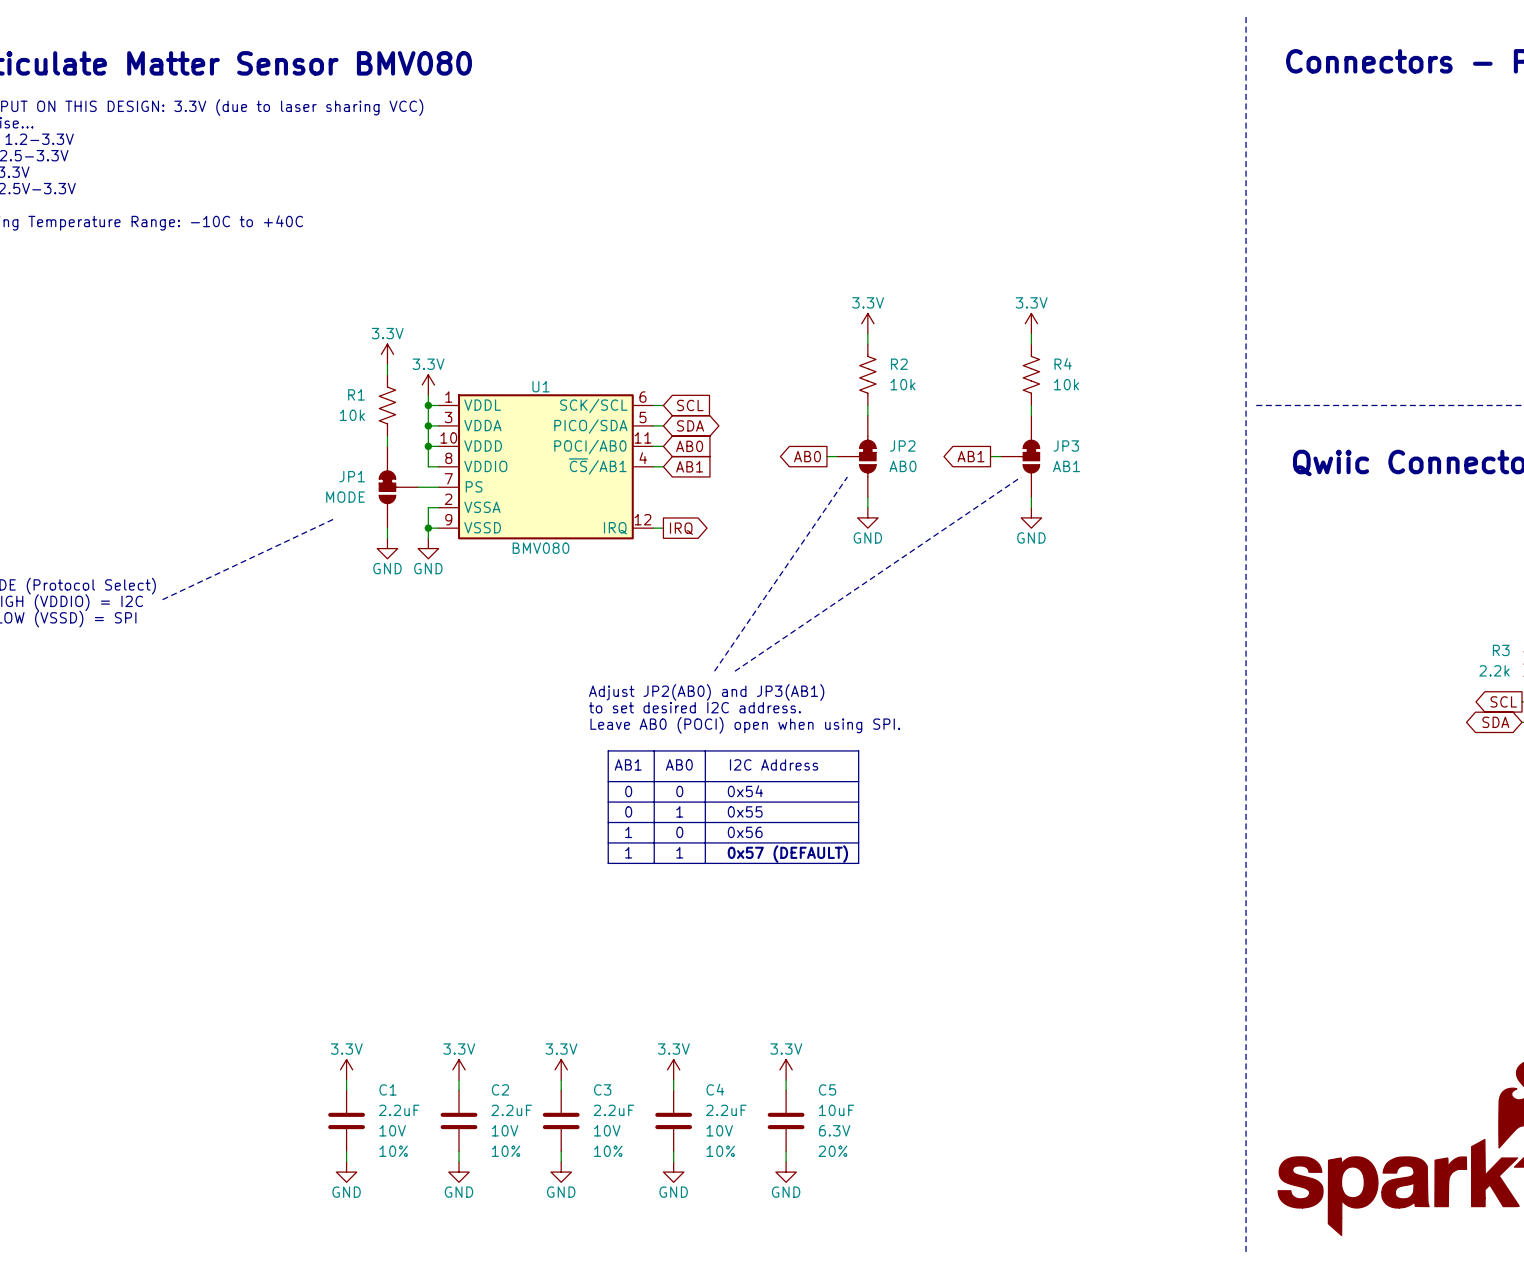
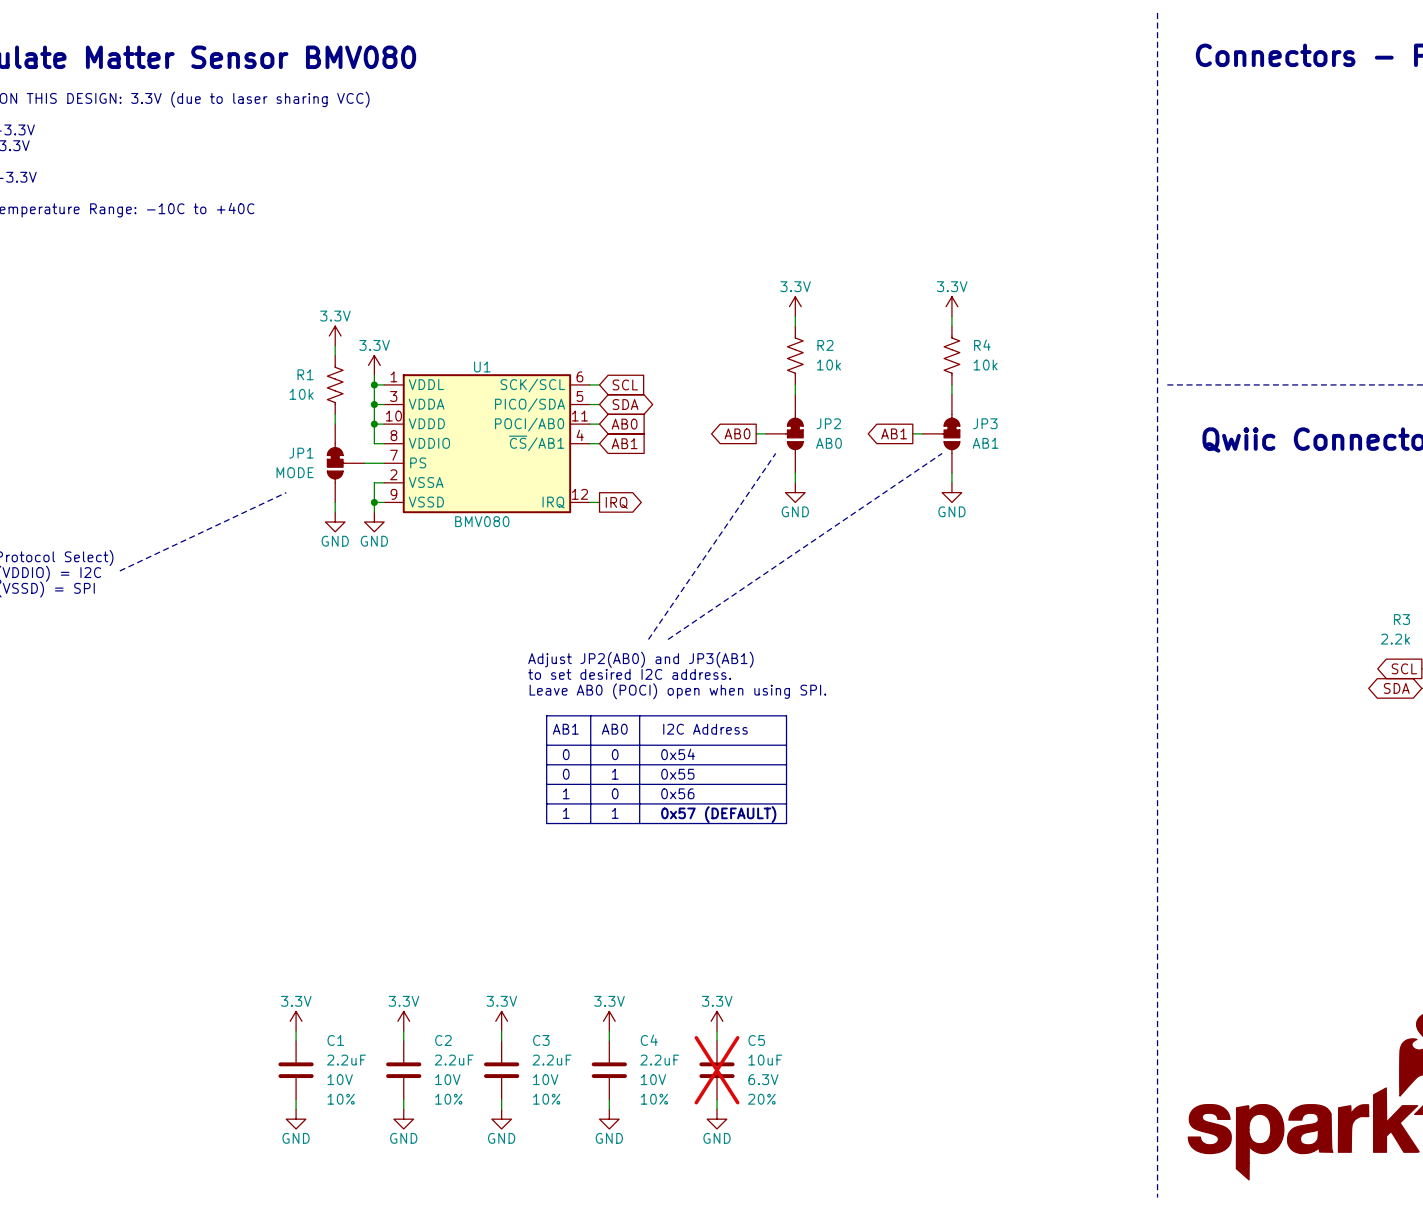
C5 do-not-place cross: none -> (717, 1070)

